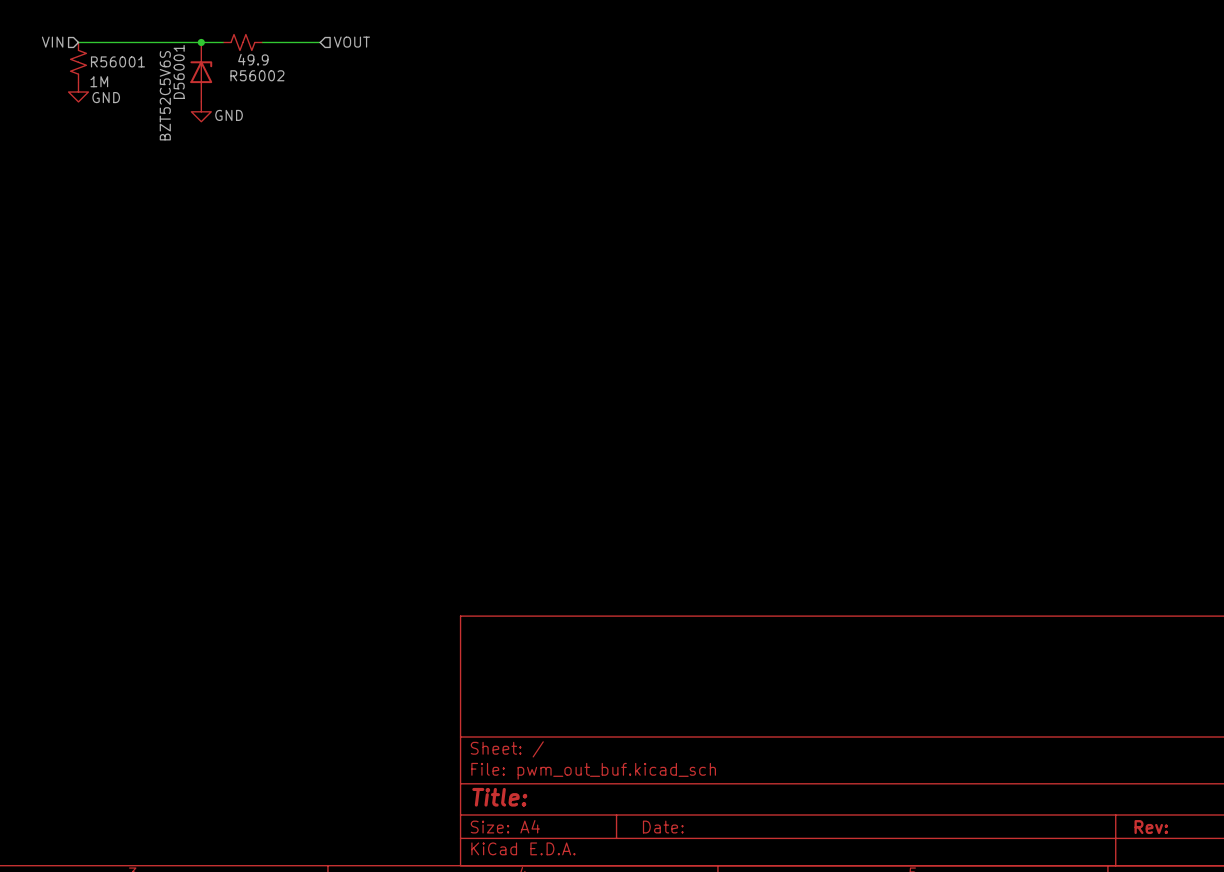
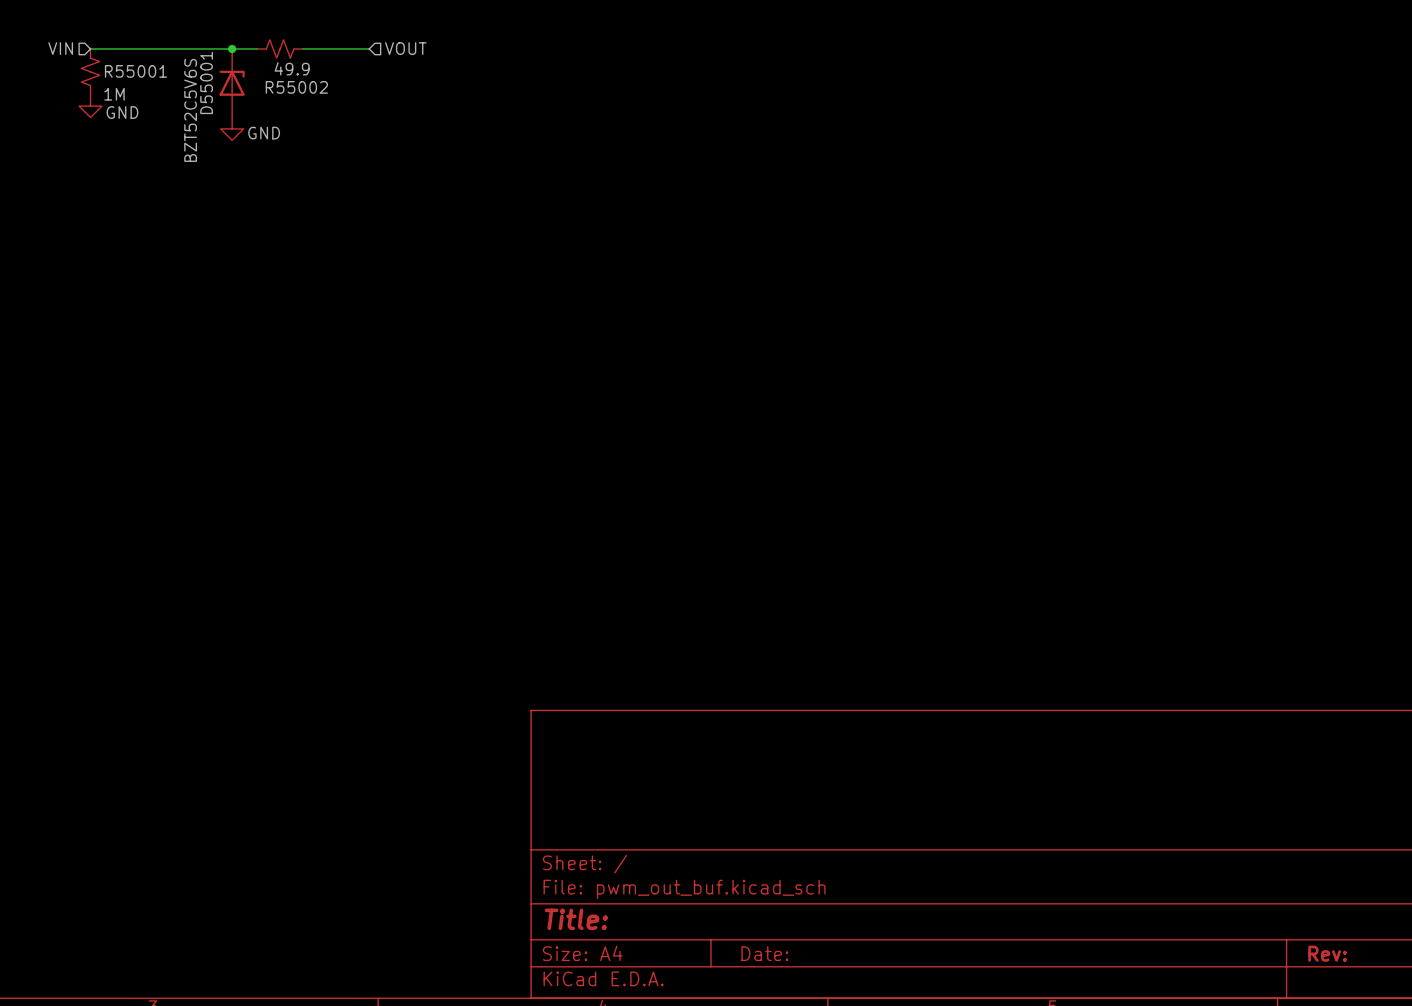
R56001 name: R56001 (117, 61) -> R55001 (136, 71)
D56001 name: D56001 (179, 71) -> D55001 (206, 82)
R56002 name: R56002 (257, 75) -> R55002 (296, 87)

